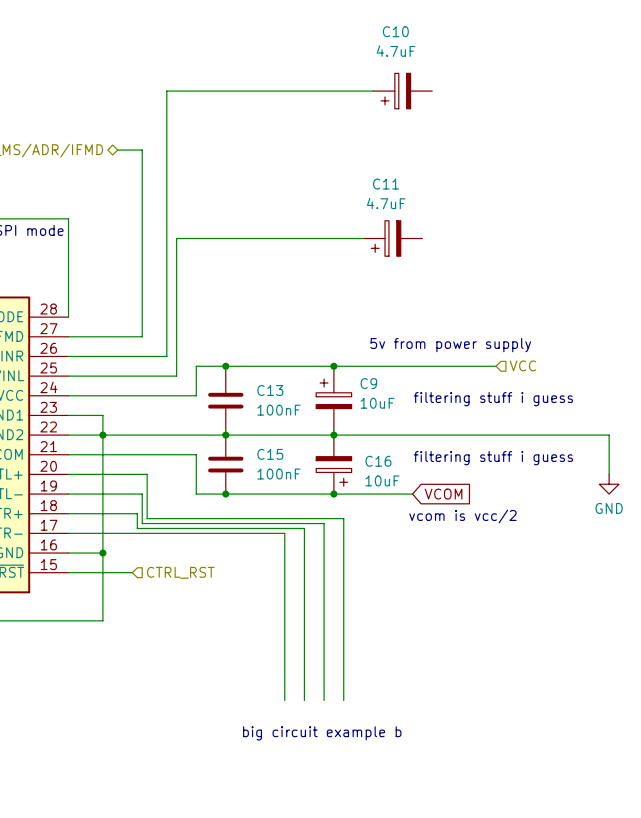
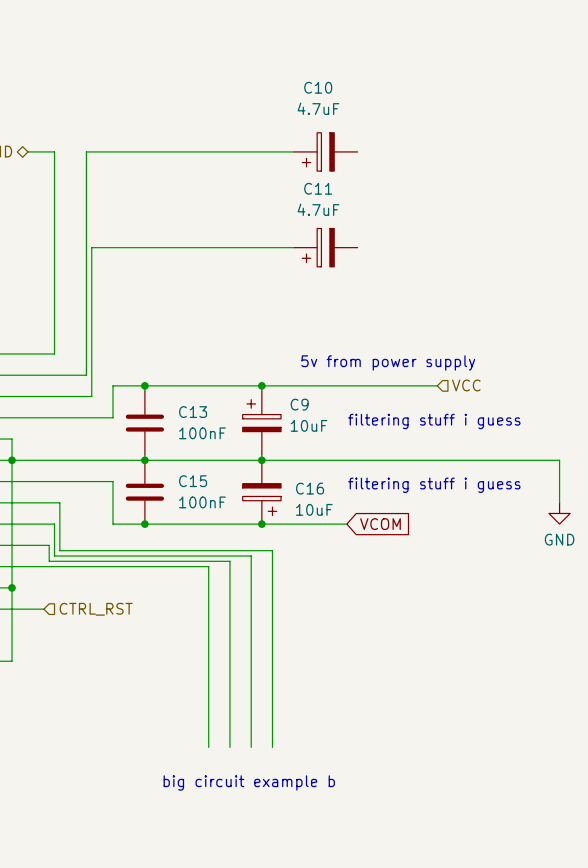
wire: (373, 91) (166, 91) (166, 356) -> (293, 151) (86, 151) (86, 375) (81, 375)
C10 position: (402, 91) -> (325, 151)
text: vcom is vcc/2 (462, 516) -> none

